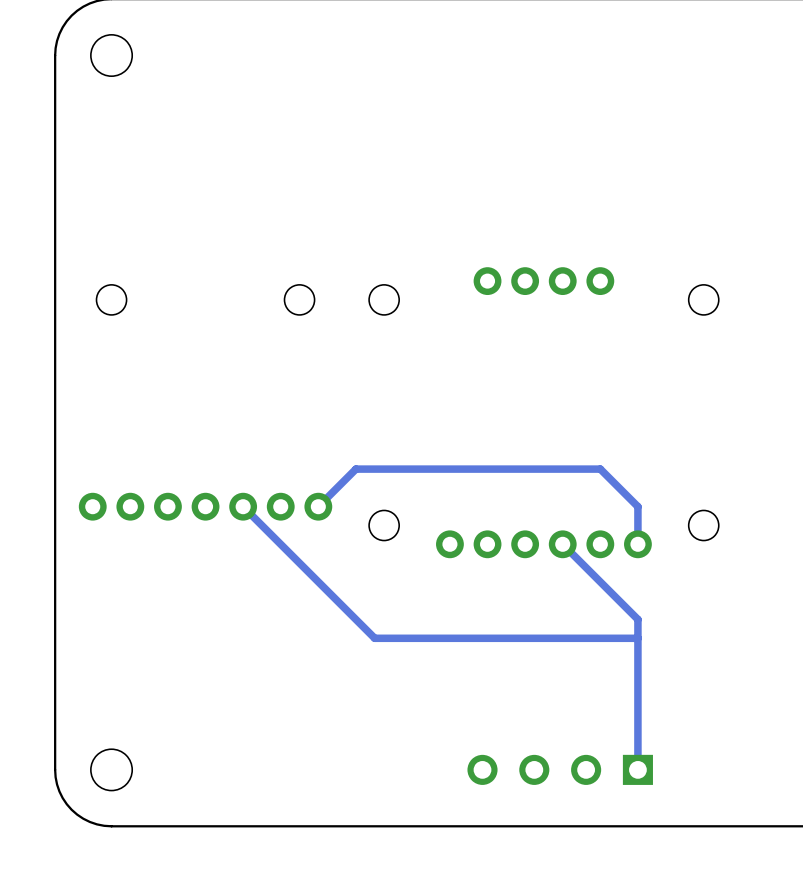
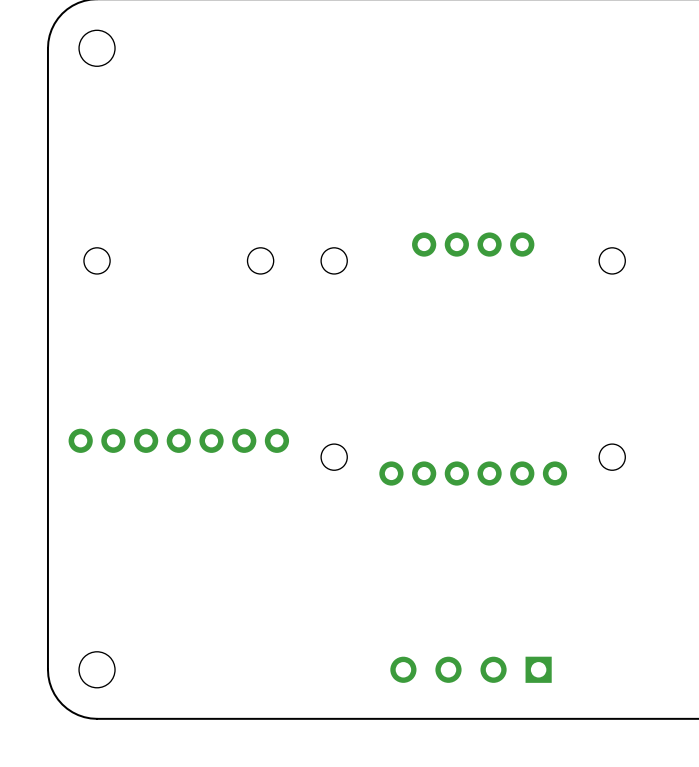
track: (243, 506) (374, 638) (637, 638) -> none
track: (318, 506) (355, 469) (600, 469) (637, 506) (637, 544) -> none
track: (562, 544) (637, 619) (637, 769) -> none
part position: (560, 769) -> (471, 669)

